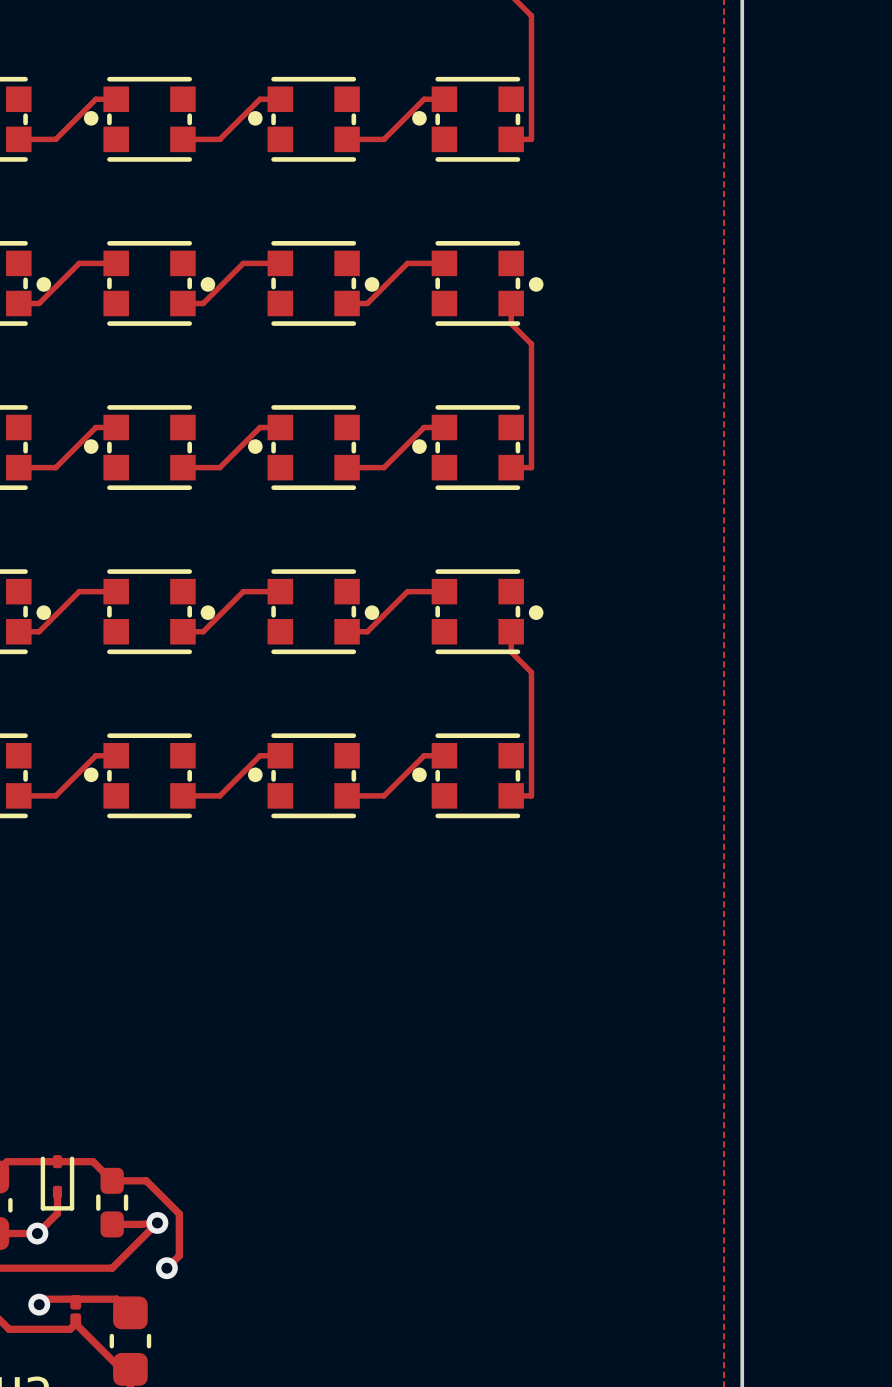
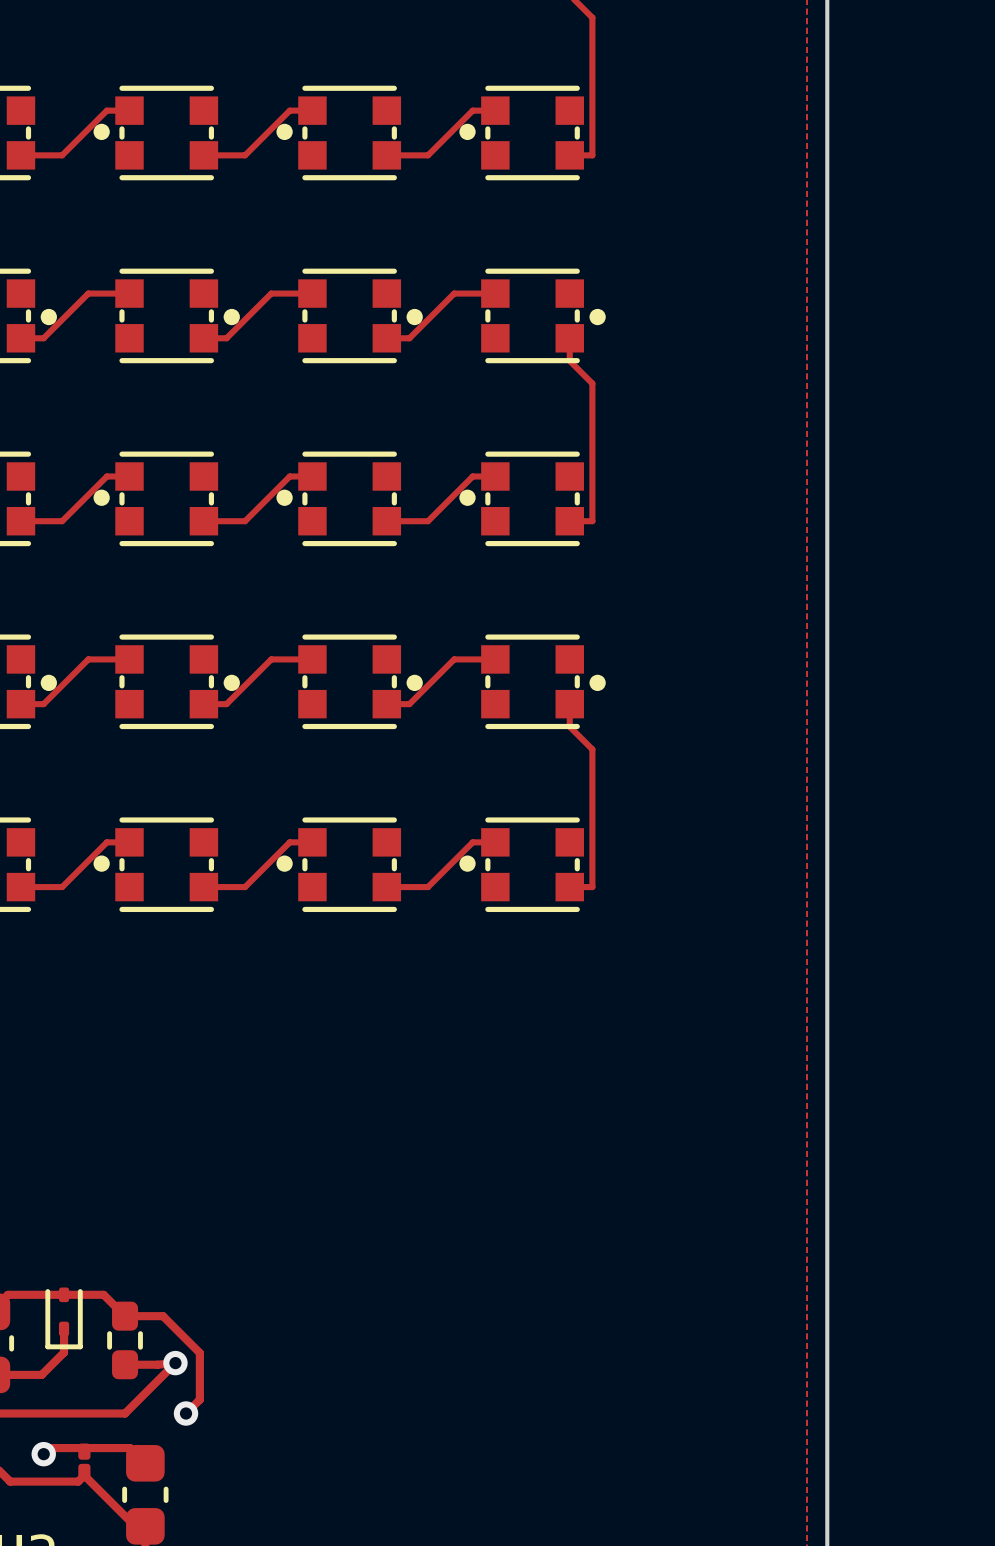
via: (37, 1233) -> none

